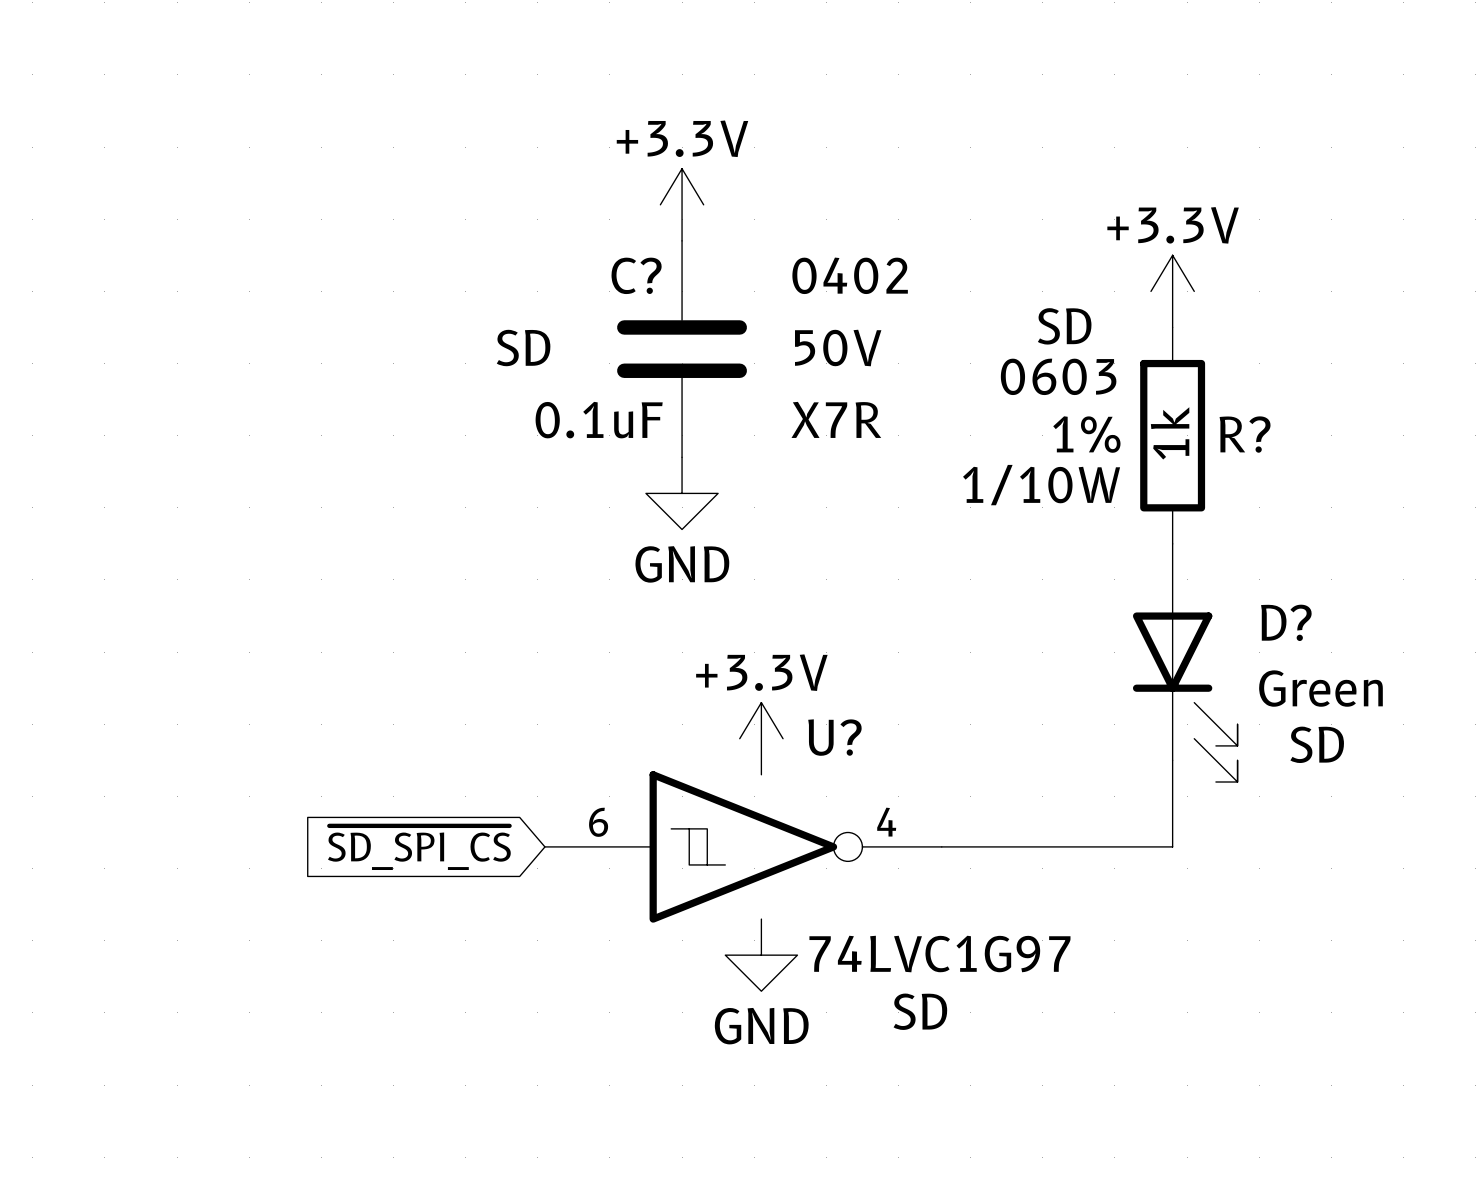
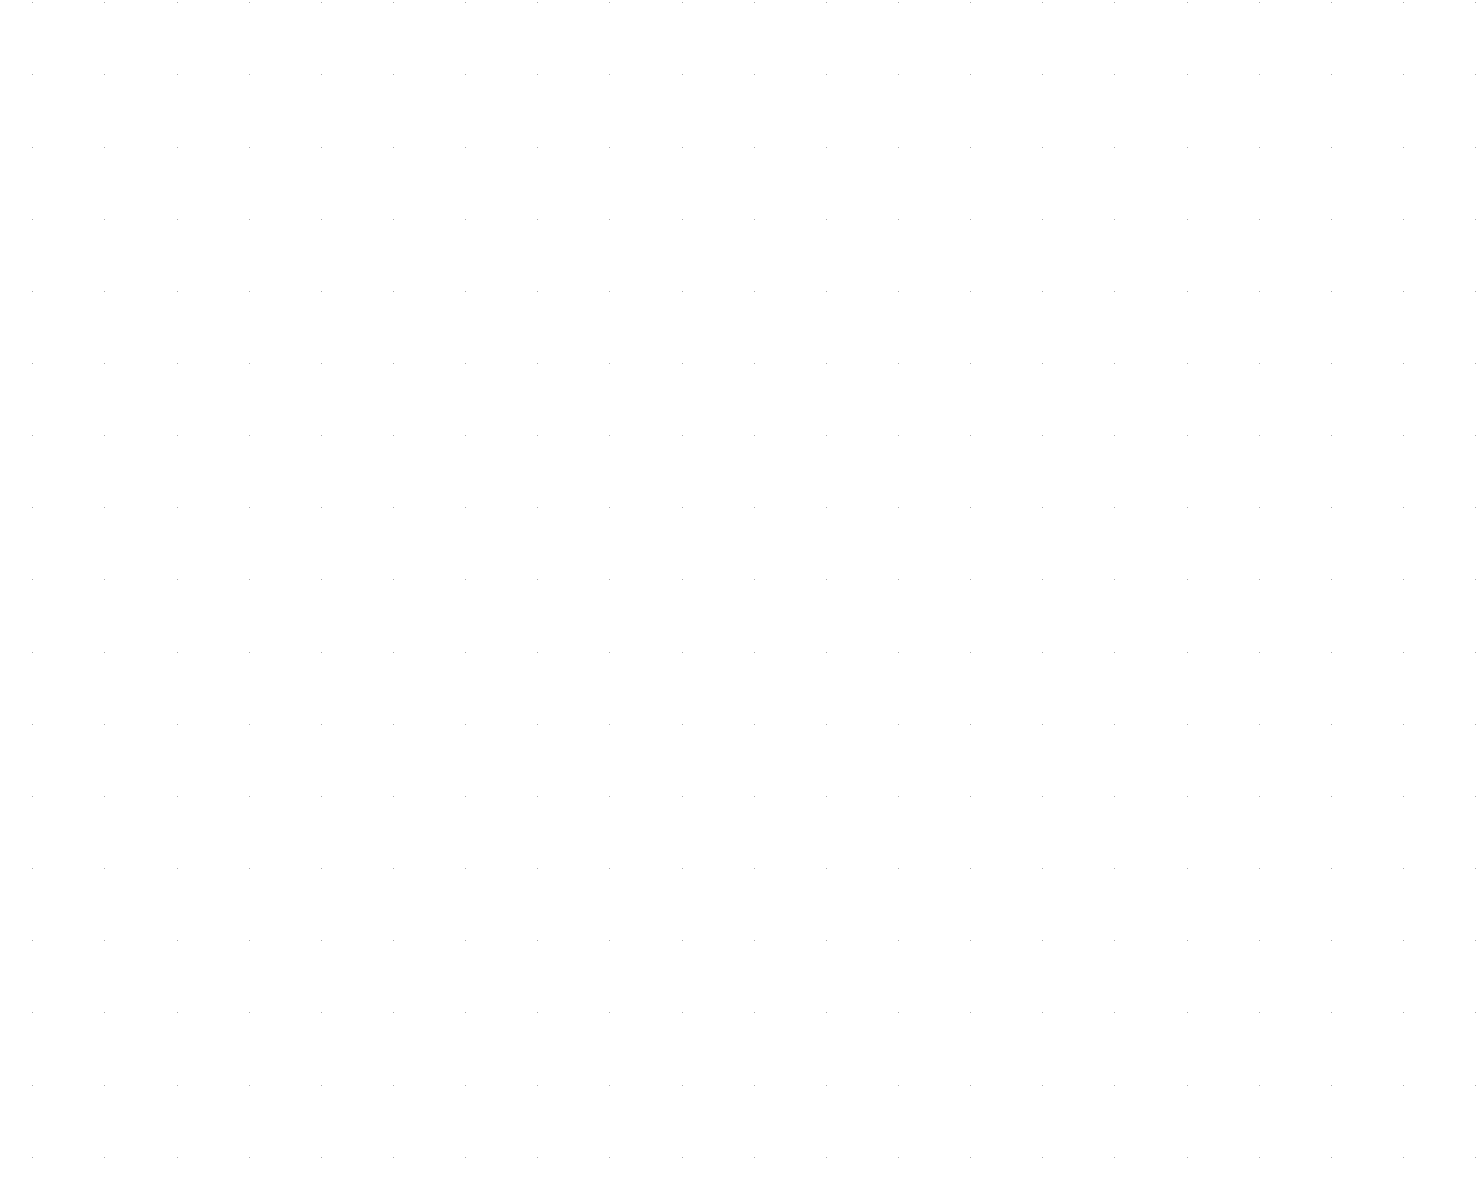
power symbol: +3.3V (682, 204) -> none
power symbol: +3.3V (1172, 291) -> none
C?: 0.1uF (682, 349) -> none
R?: 1k (1172, 435) -> none
power symbol: GND (682, 493) -> none
D?: Green (1185, 662) -> none
power symbol: +3.3V (761, 738) -> none
wire: (1172, 760) (1172, 846) (941, 846) -> none
U?: 74LVC1G97 (743, 846) -> none
global label: ~{SD_SPI_CS} (419, 847) -> none
power symbol: GND (761, 955) -> none

